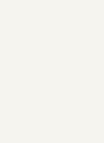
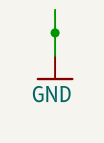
wire: none -> (55, 9) (55, 55)
junction: none -> (55, 32)
power symbol: none -> GND (55, 68)

